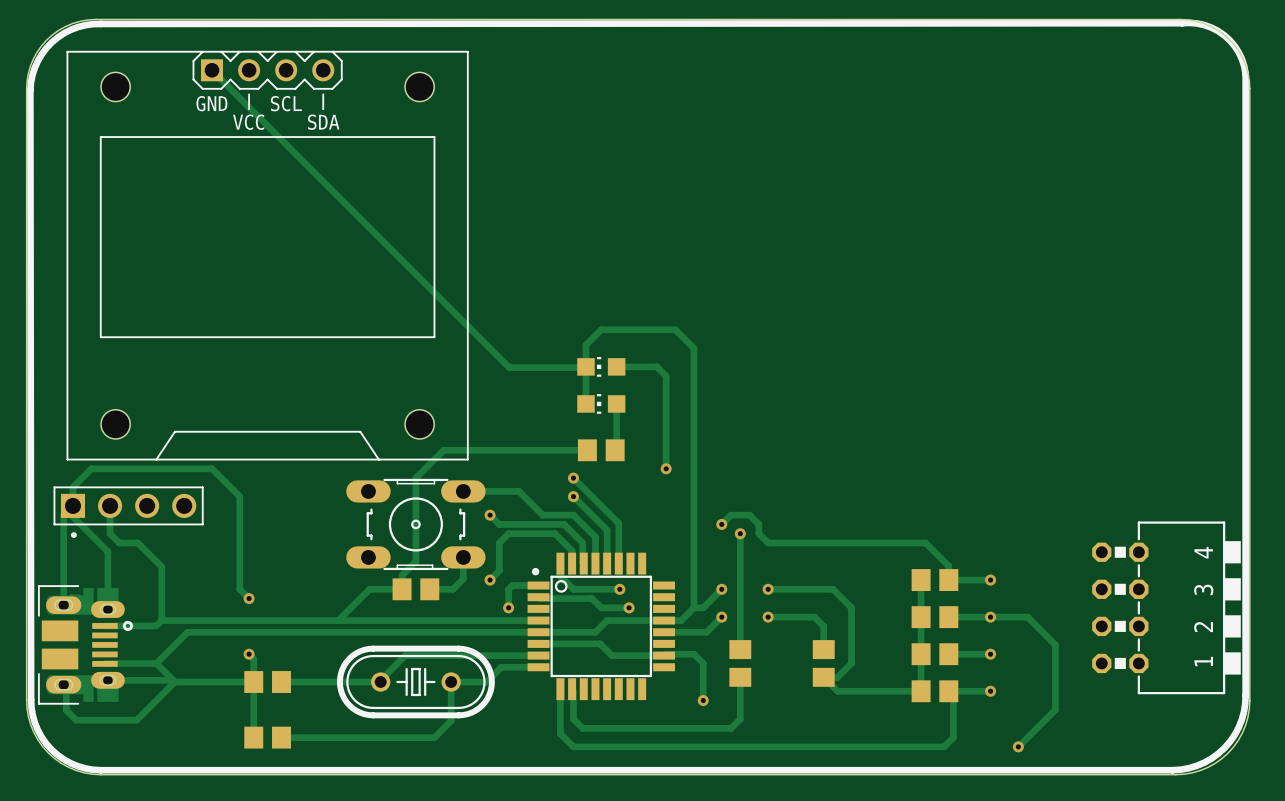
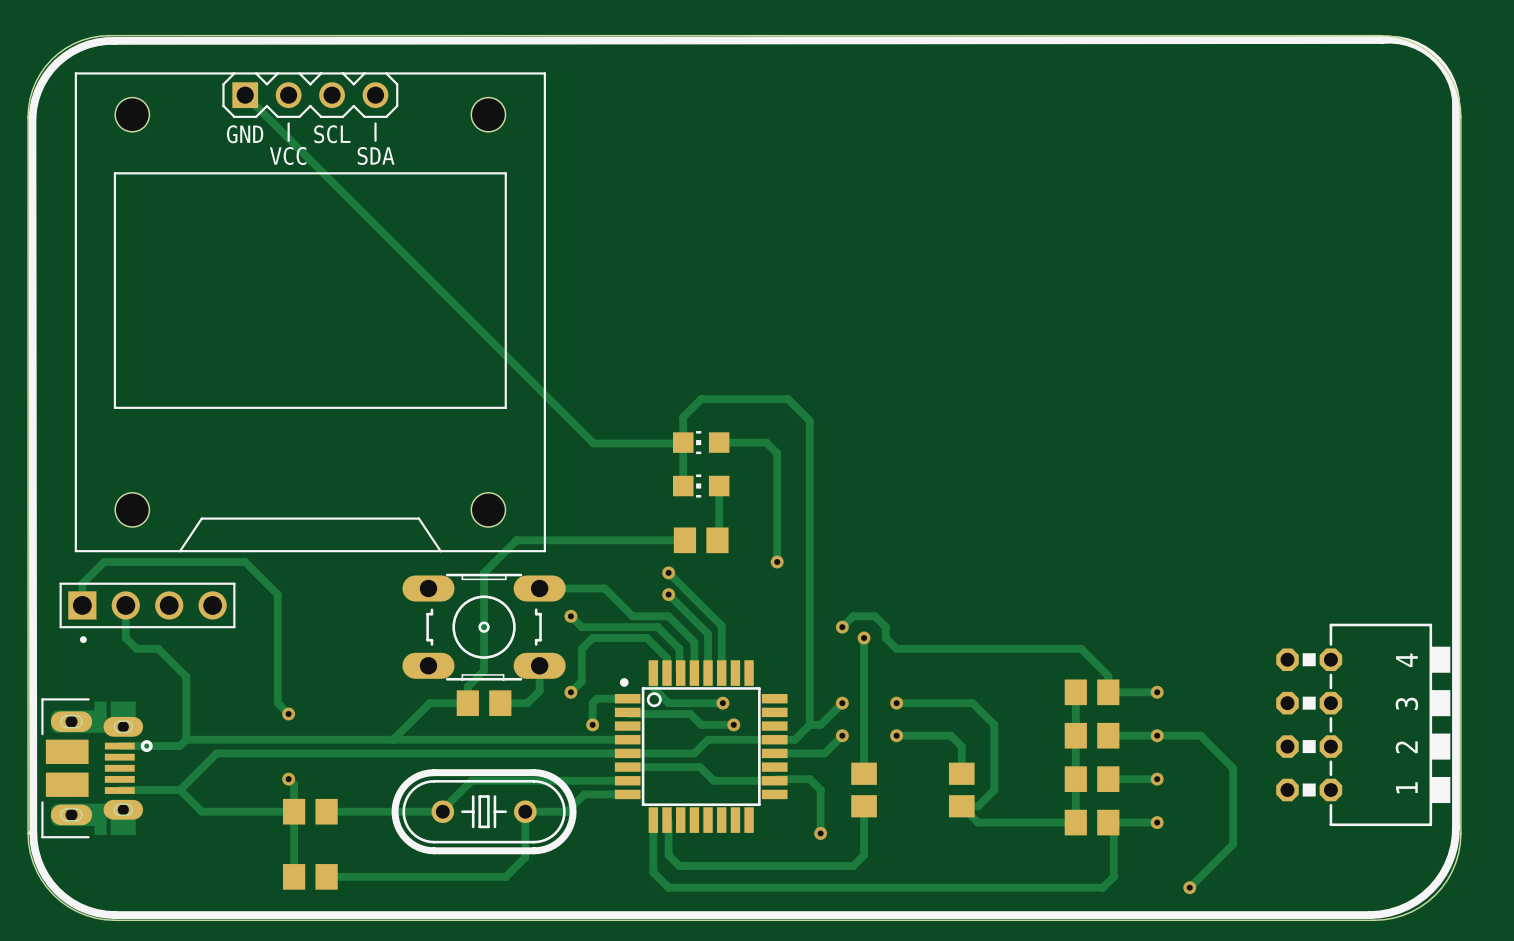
track: (79, 597) (71, 597) (63, 605) (63, 515) (72, 505) (72, 516) (107, 551) (107, 609) -> none
track: (107, 680) (173, 680) -> none
track: (174, 682) (136, 720) (76, 720) (66, 710) (66, 687) (63, 684) -> none

